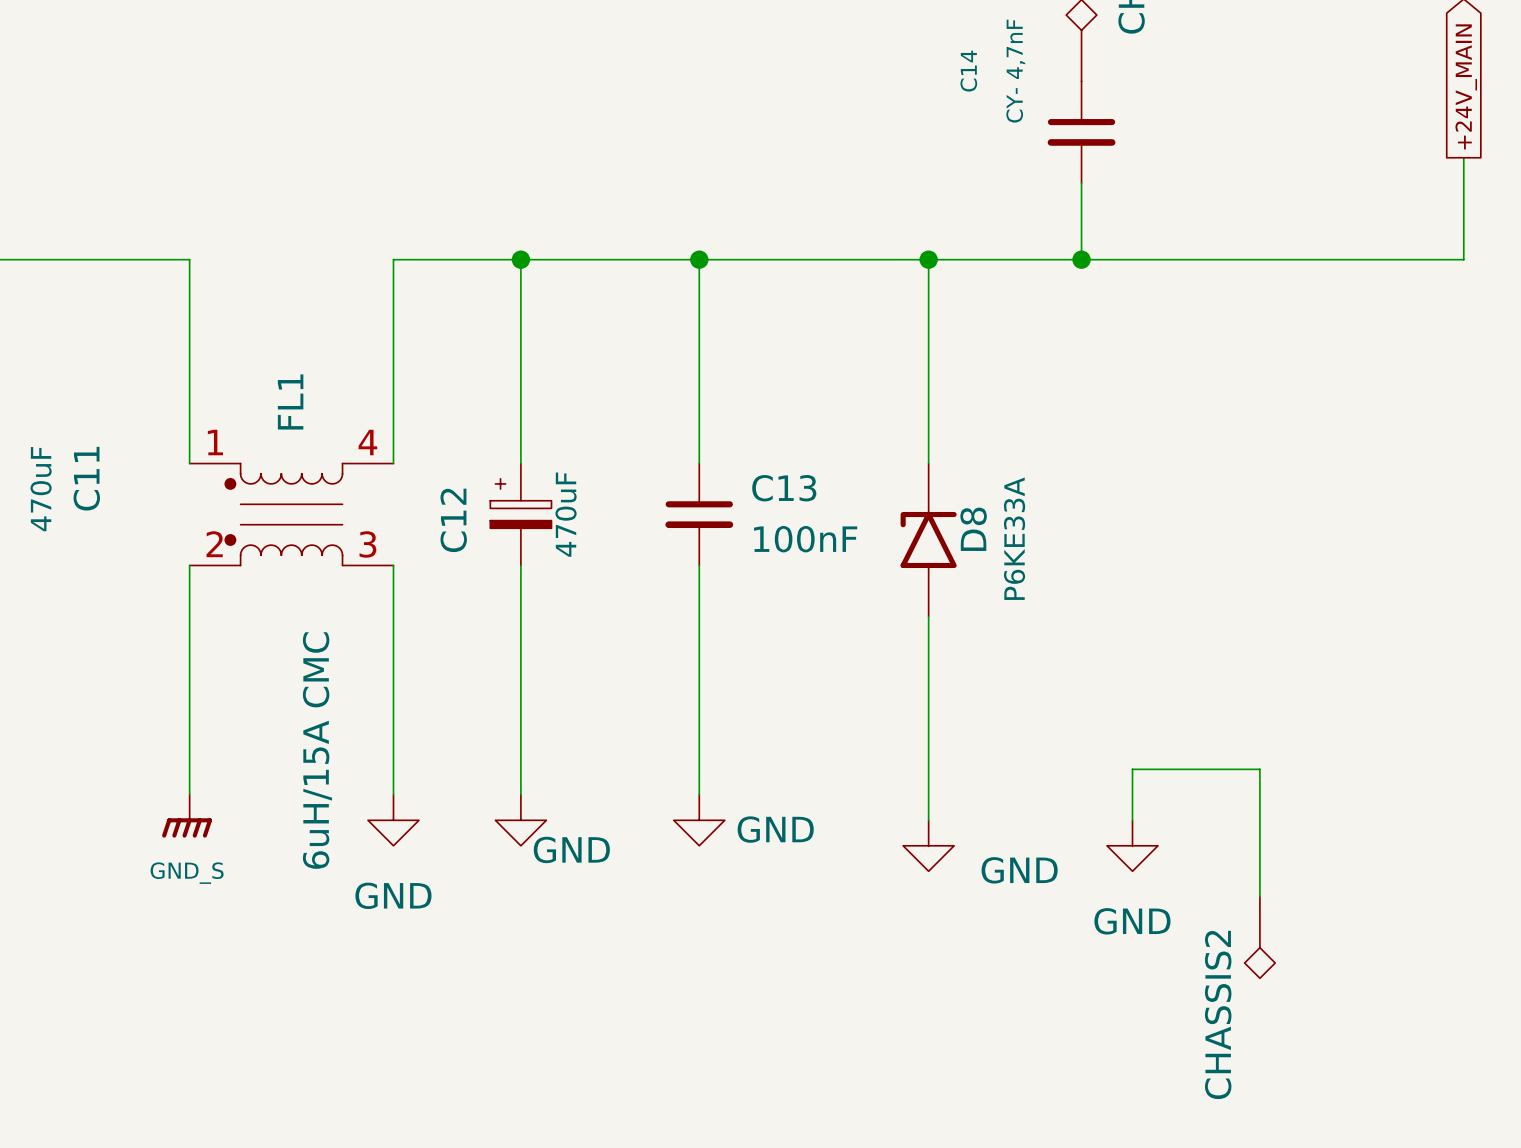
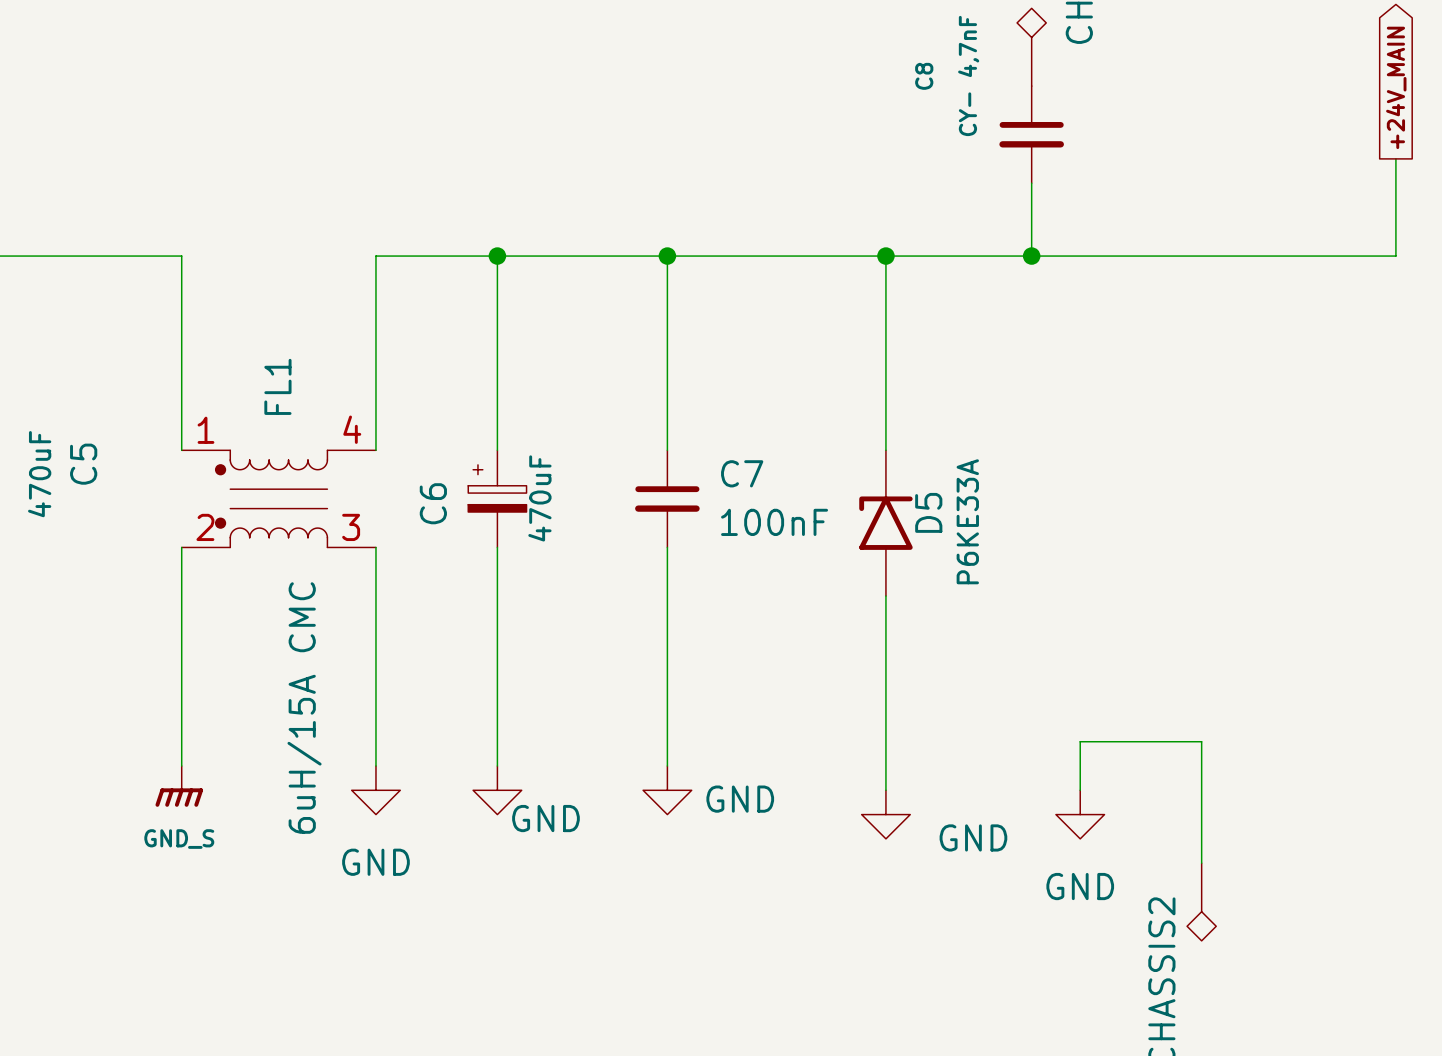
C14 name: C14 (968, 71) -> C8 (924, 76)
C11 name: C11 (86, 478) -> C5 (83, 464)
C13 name: C13 (784, 488) -> C7 (742, 473)
C12 name: C12 (453, 520) -> C6 (433, 503)
D8 name: D8 (973, 529) -> D5 (928, 512)

